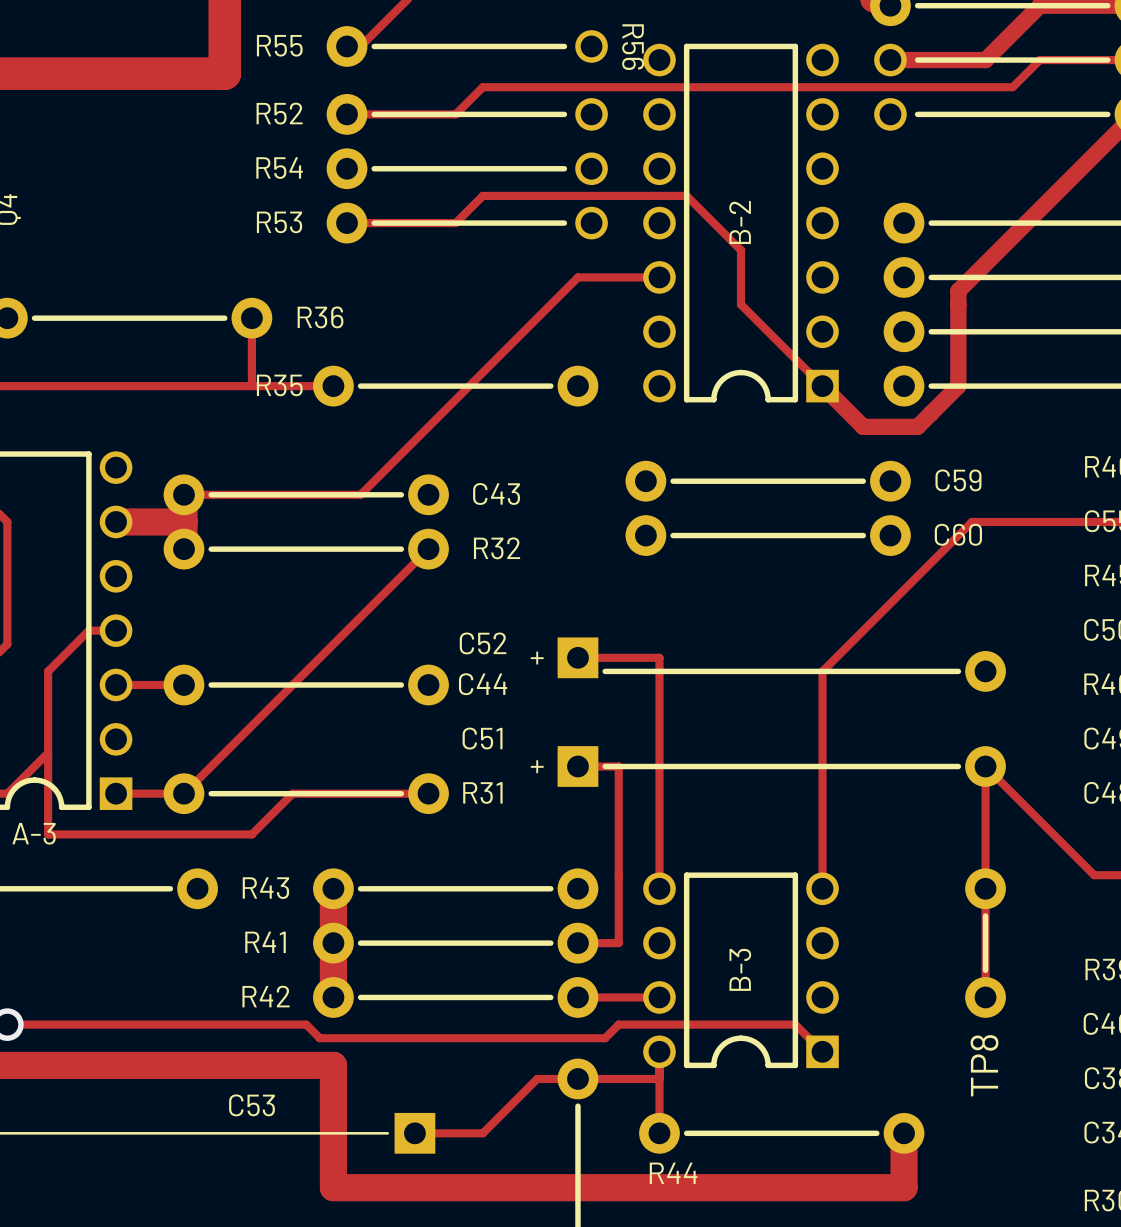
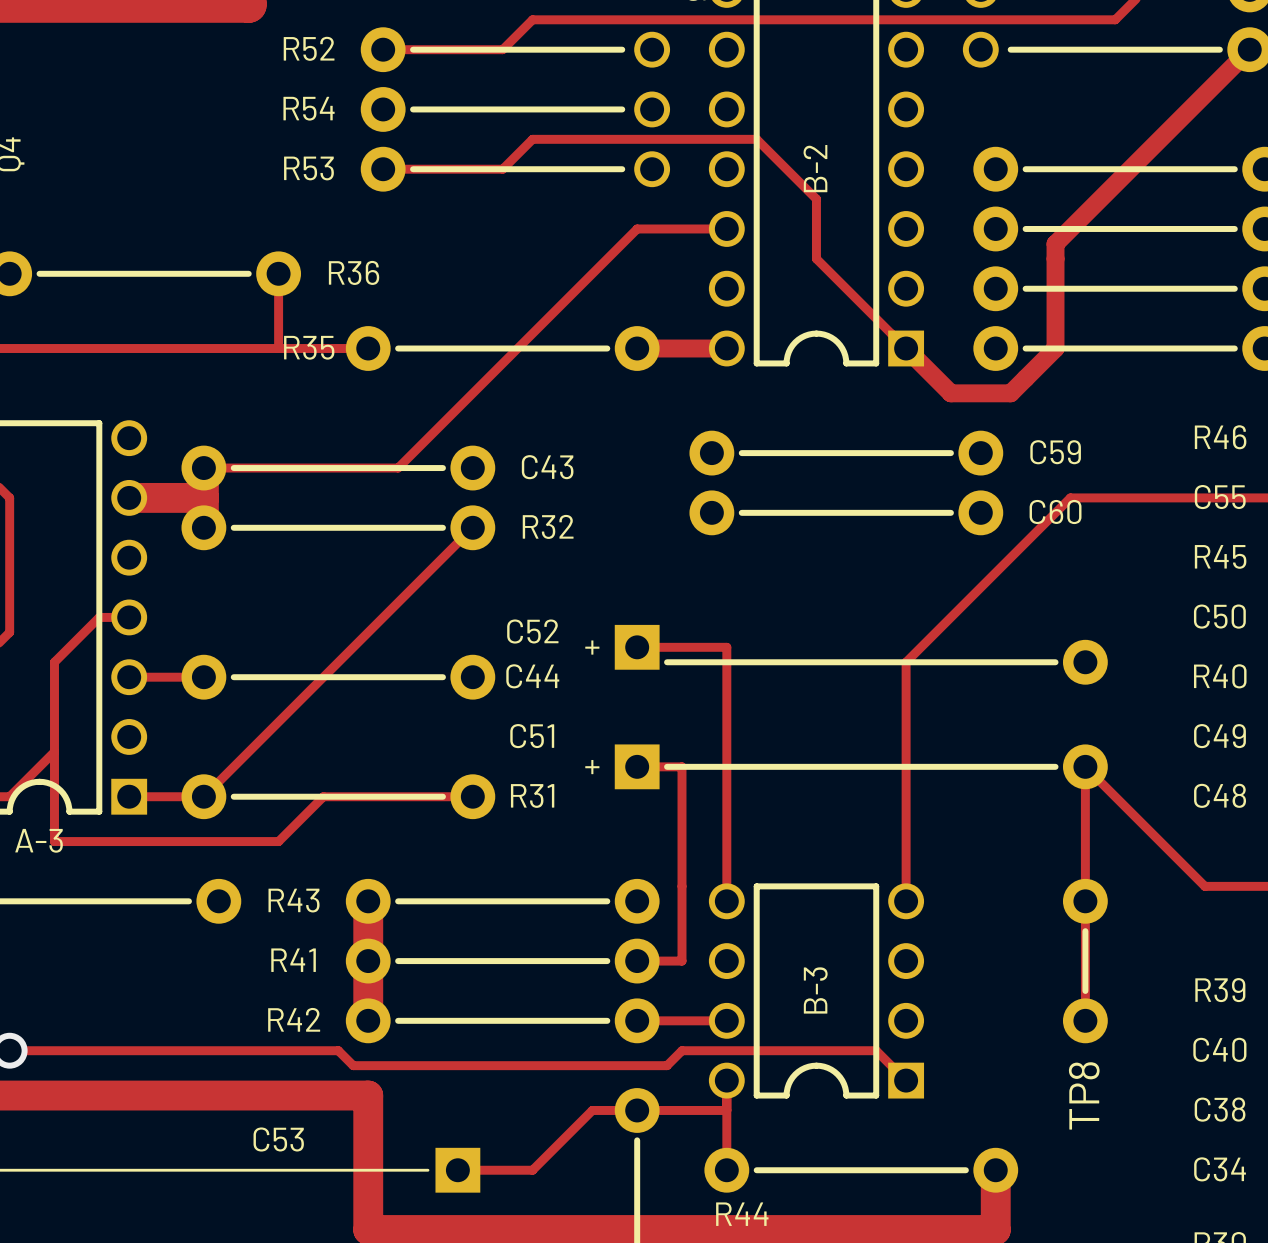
track: none -> (637, 348) (726, 348)

